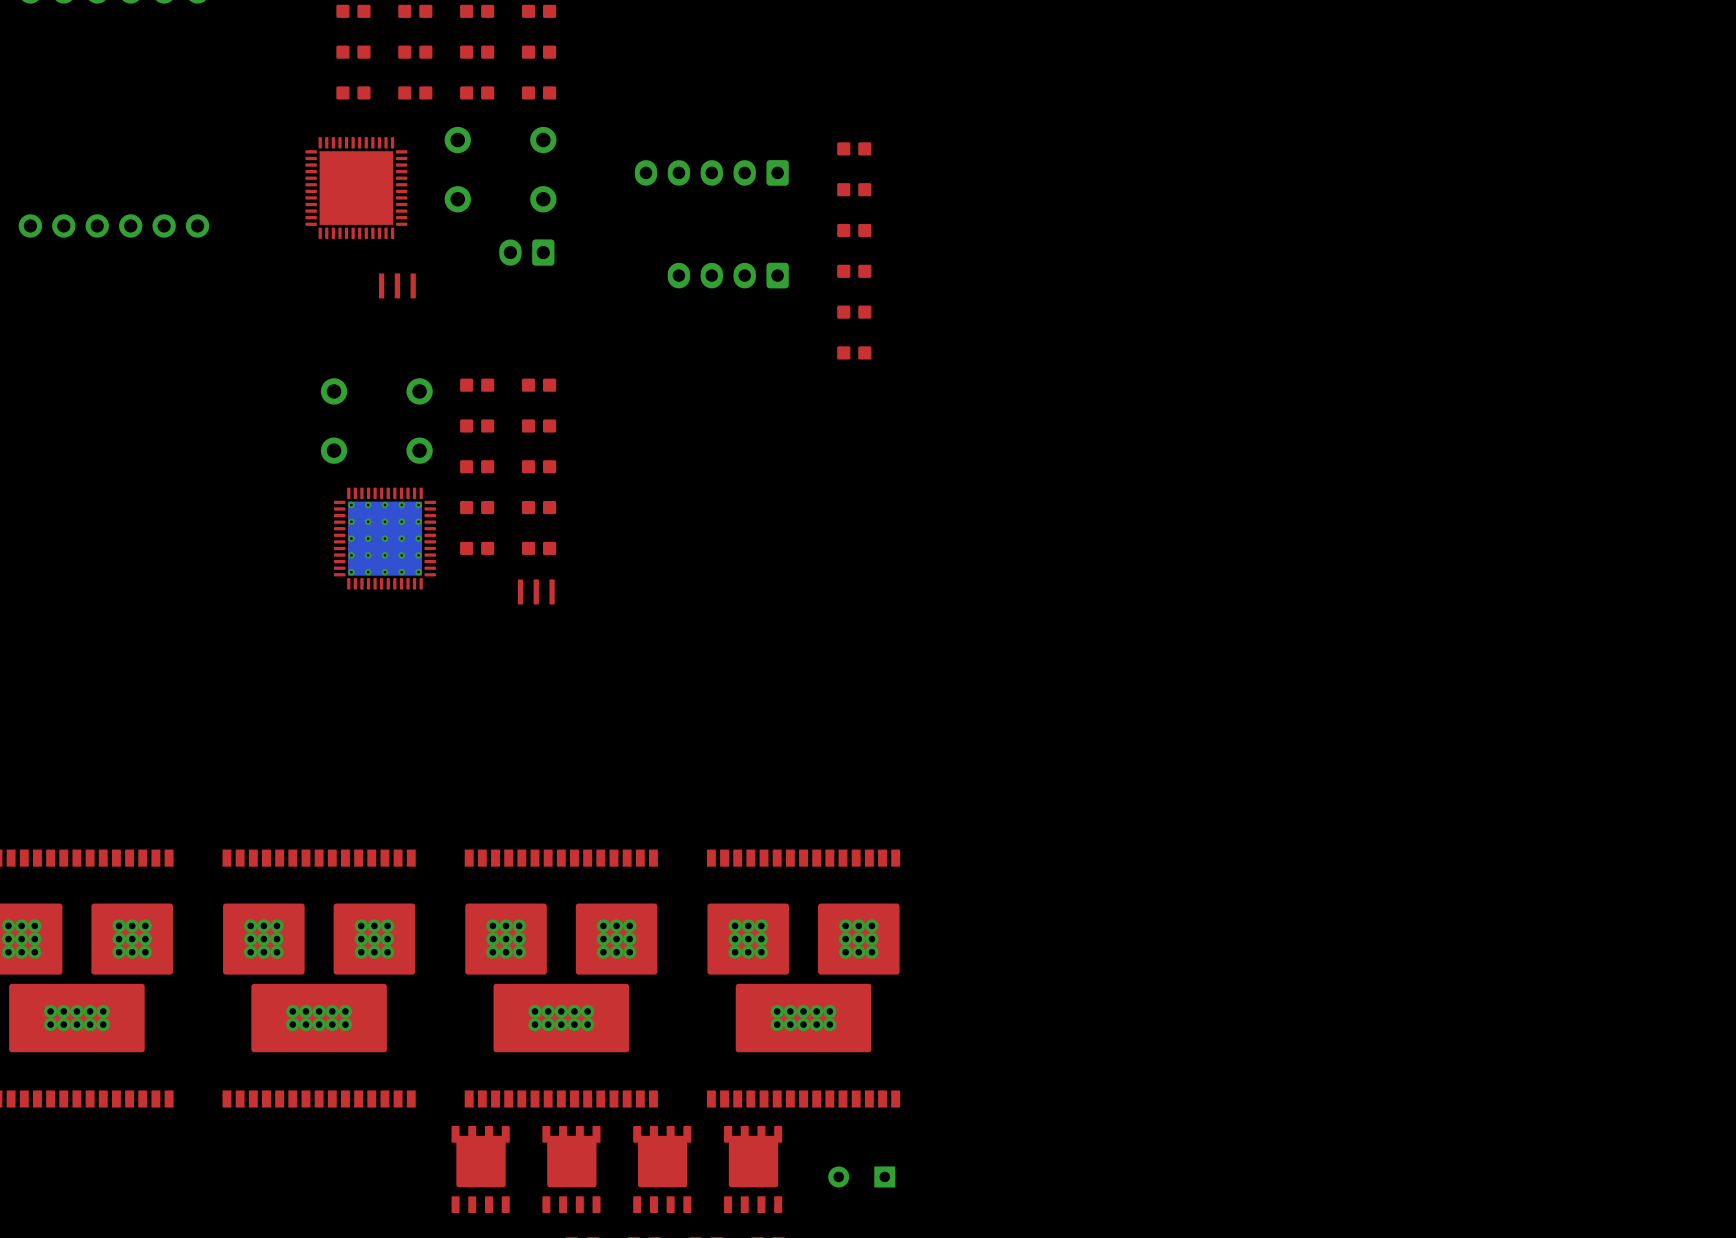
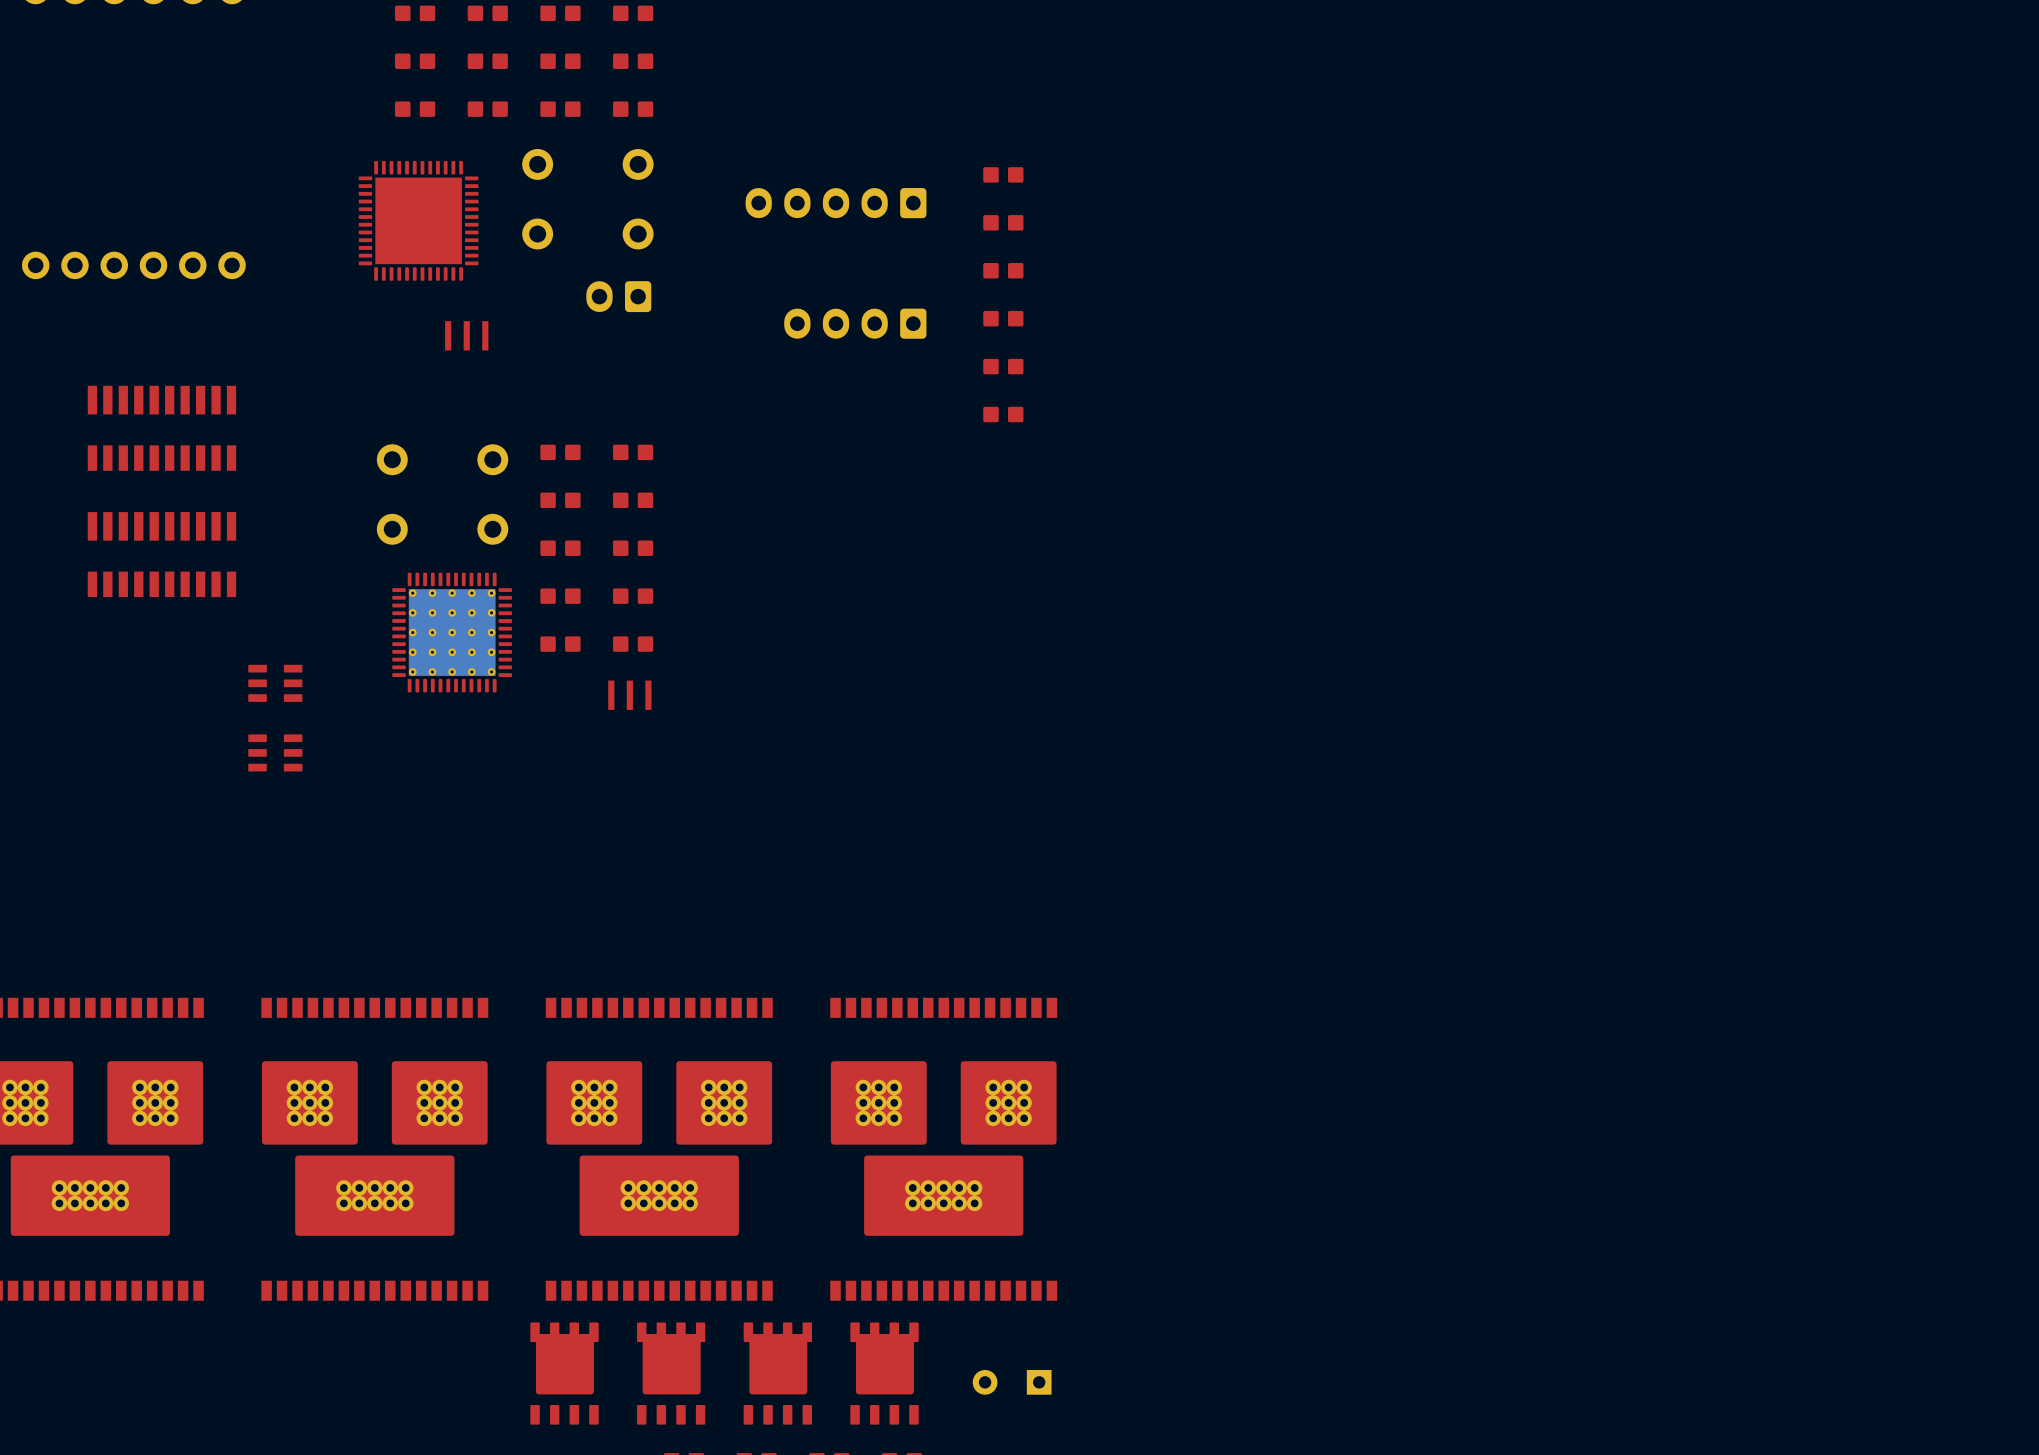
part: none -> (161, 428)
part: none -> (161, 554)
part: none -> (275, 683)
part: none -> (275, 752)

